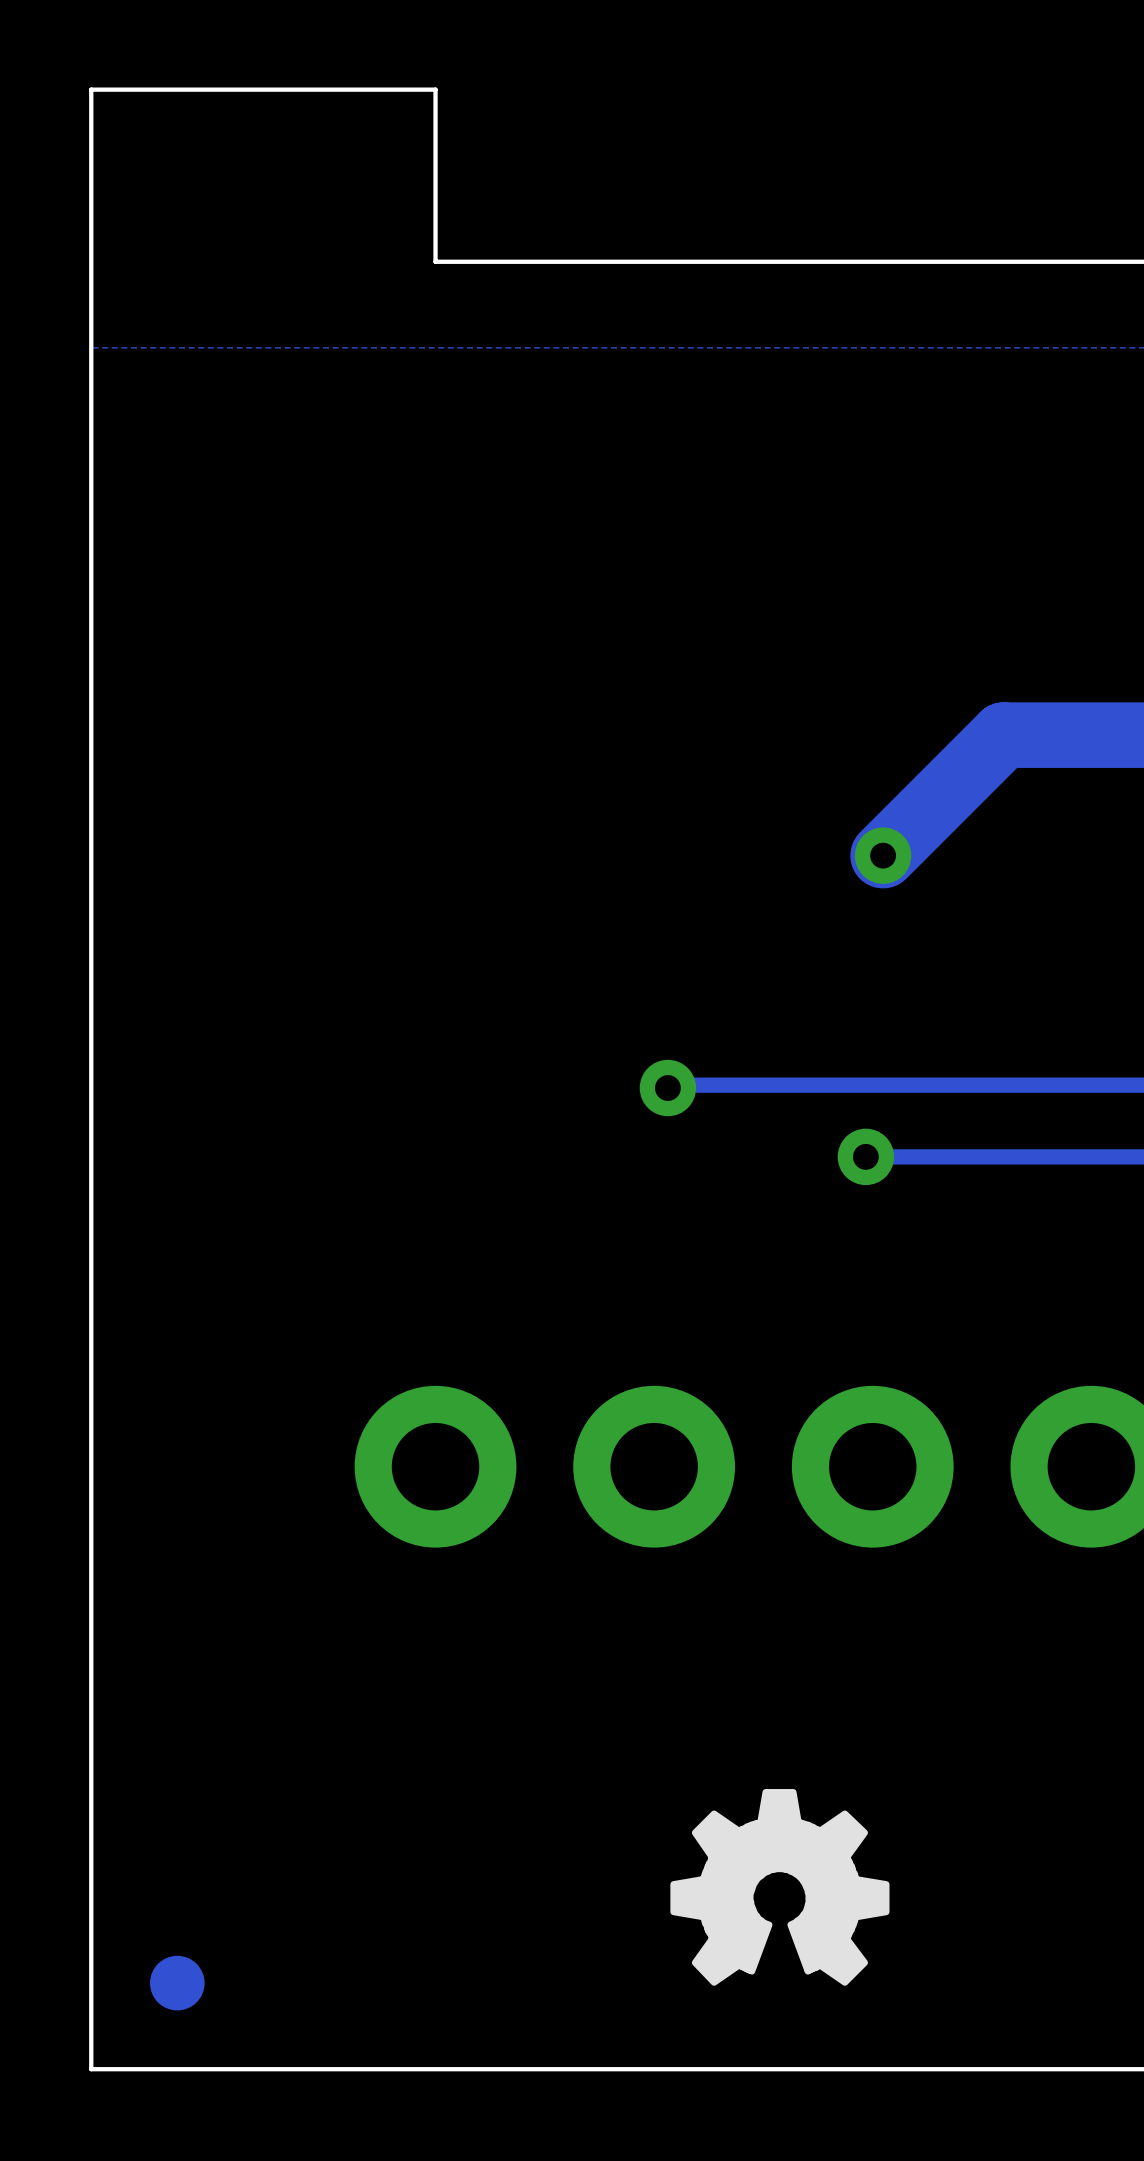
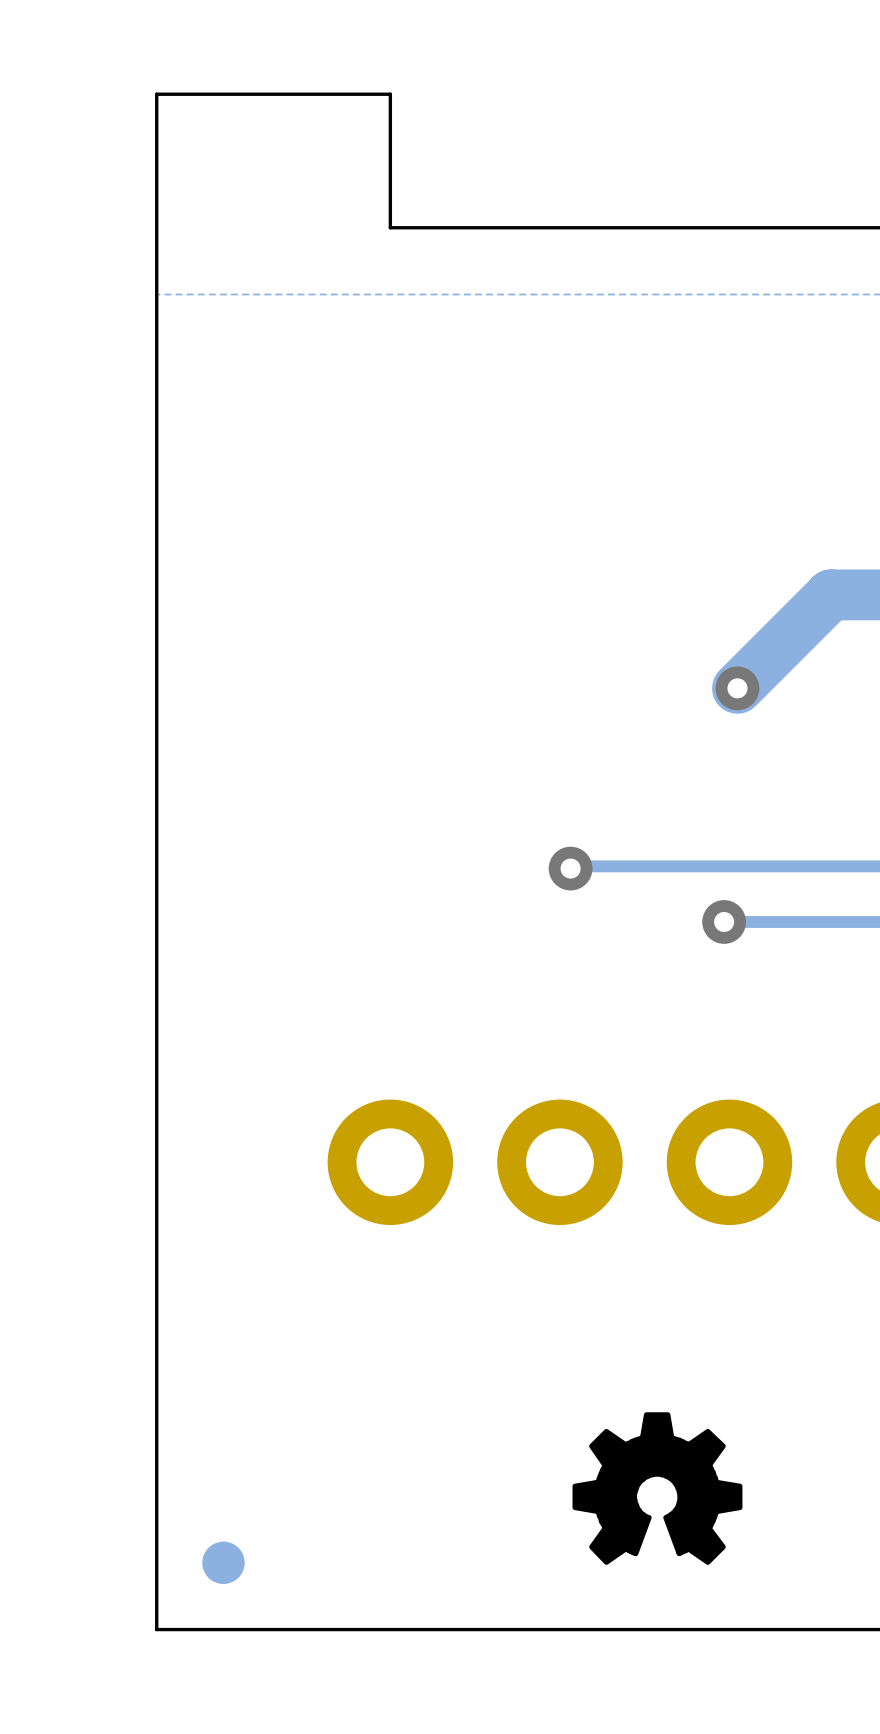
board edge: (134, 89) (91, 89) (91, 2069) (134, 2069) -> (156, 94) (156, 1629)
part position: (177, 1983) -> (223, 1562)

